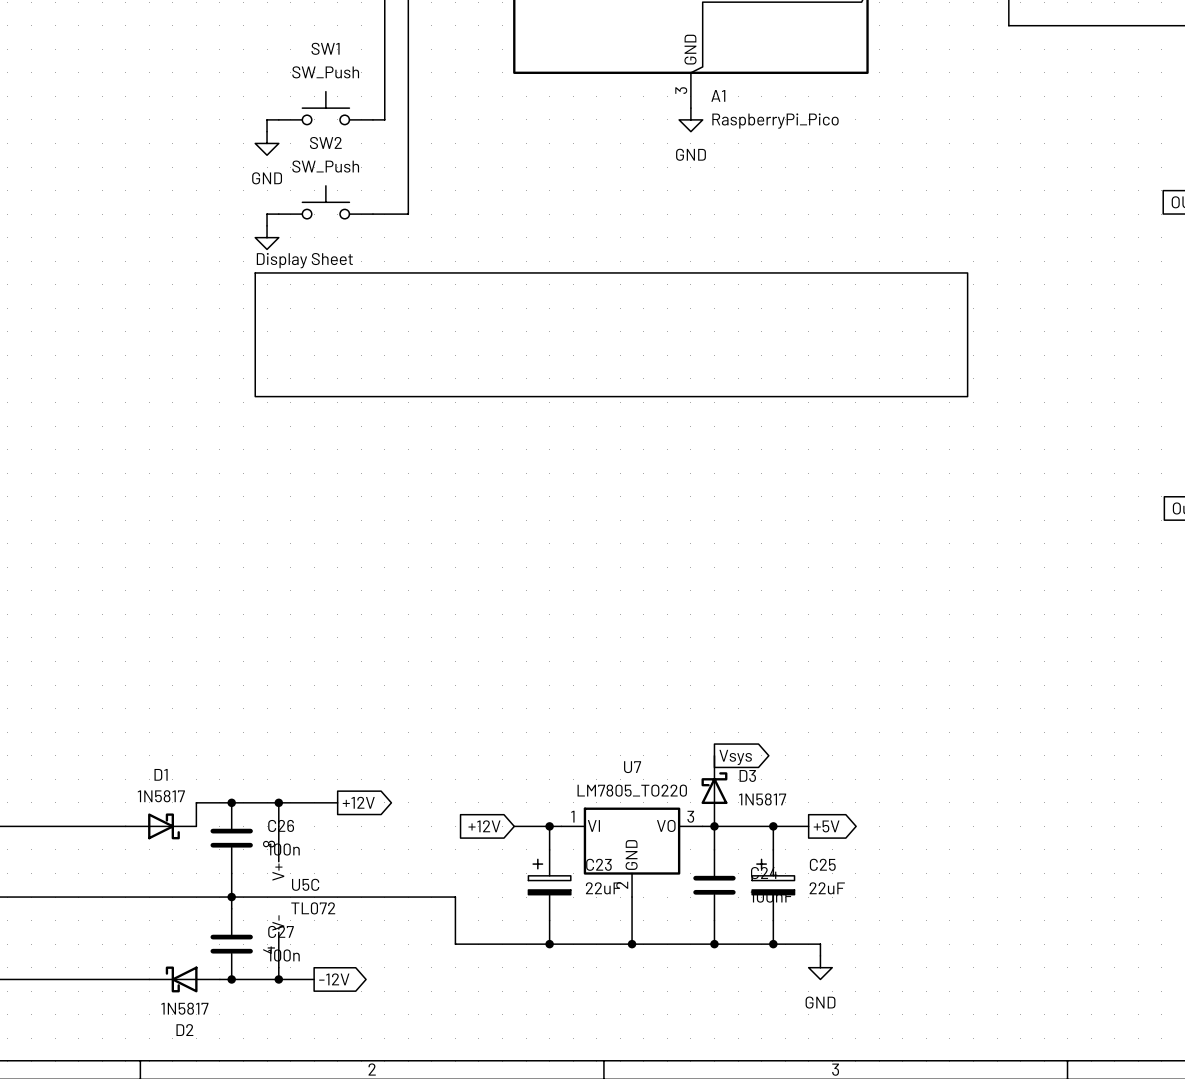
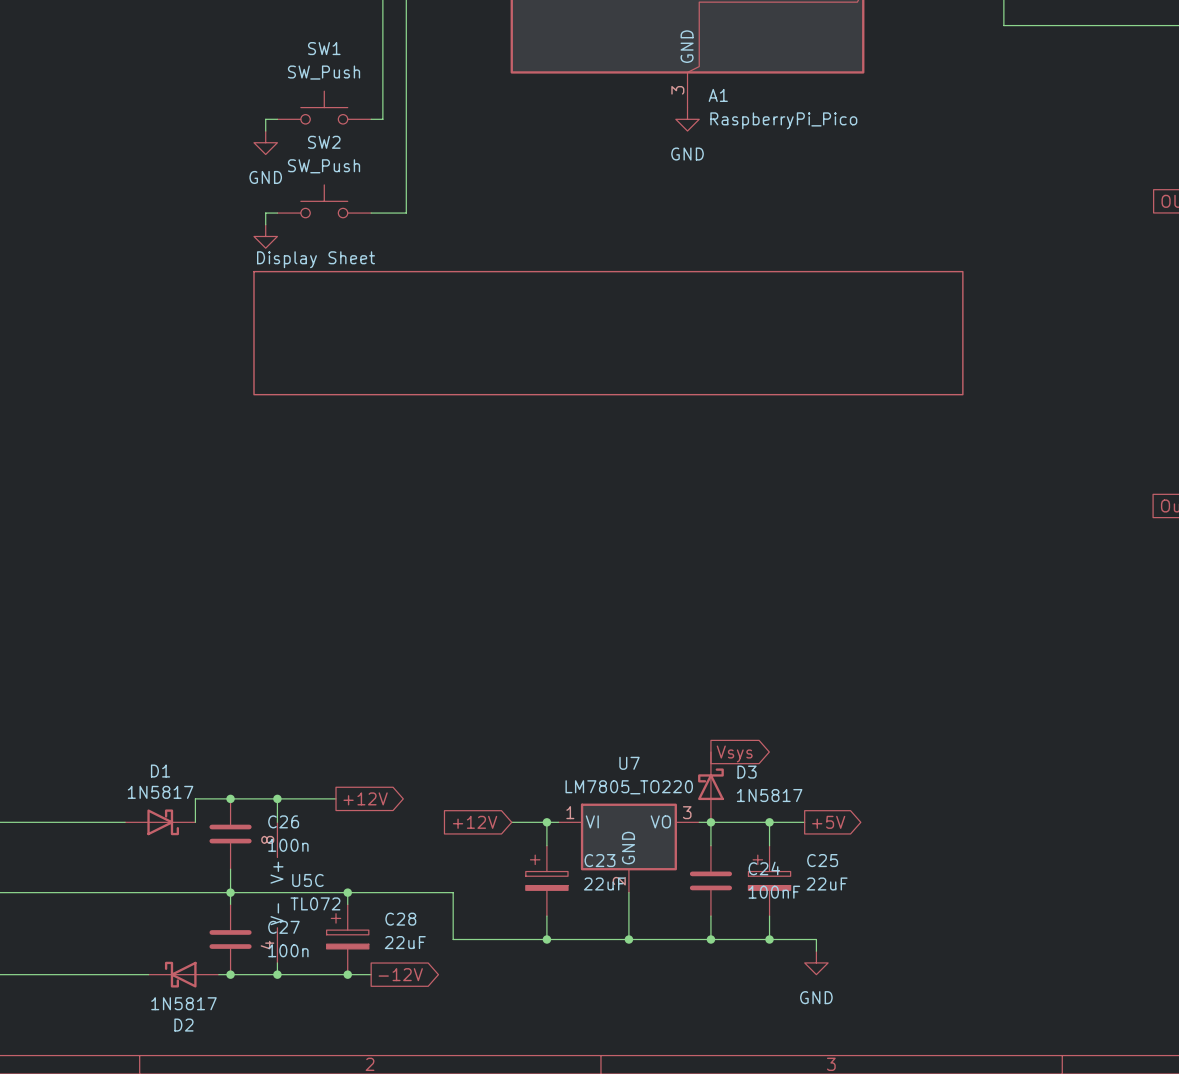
wire: none -> (347, 892) (347, 904)
junction: none -> (347, 892)
C28: none -> 22uF (347, 939)
wire: none -> (312, 974) (371, 974)
global label position: -12V (334, 979) -> -12V (400, 974)
junction: none -> (347, 974)

